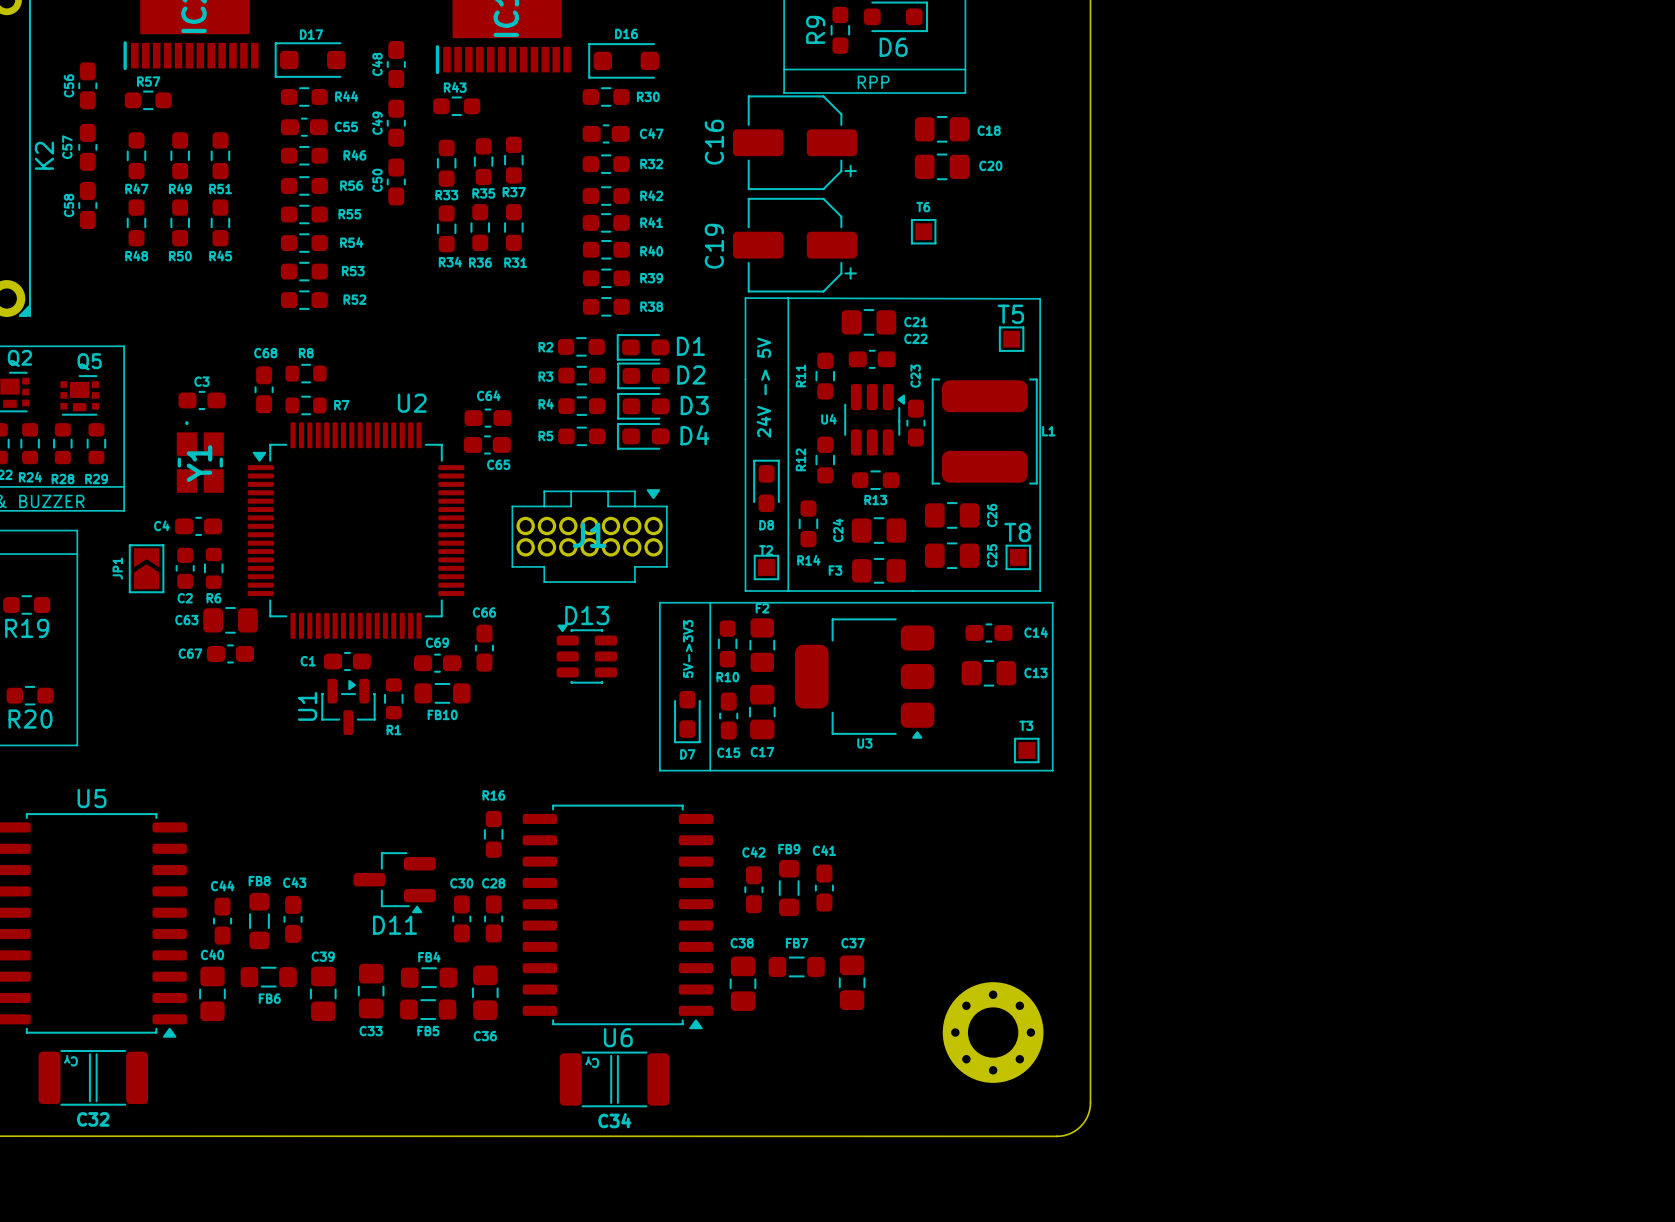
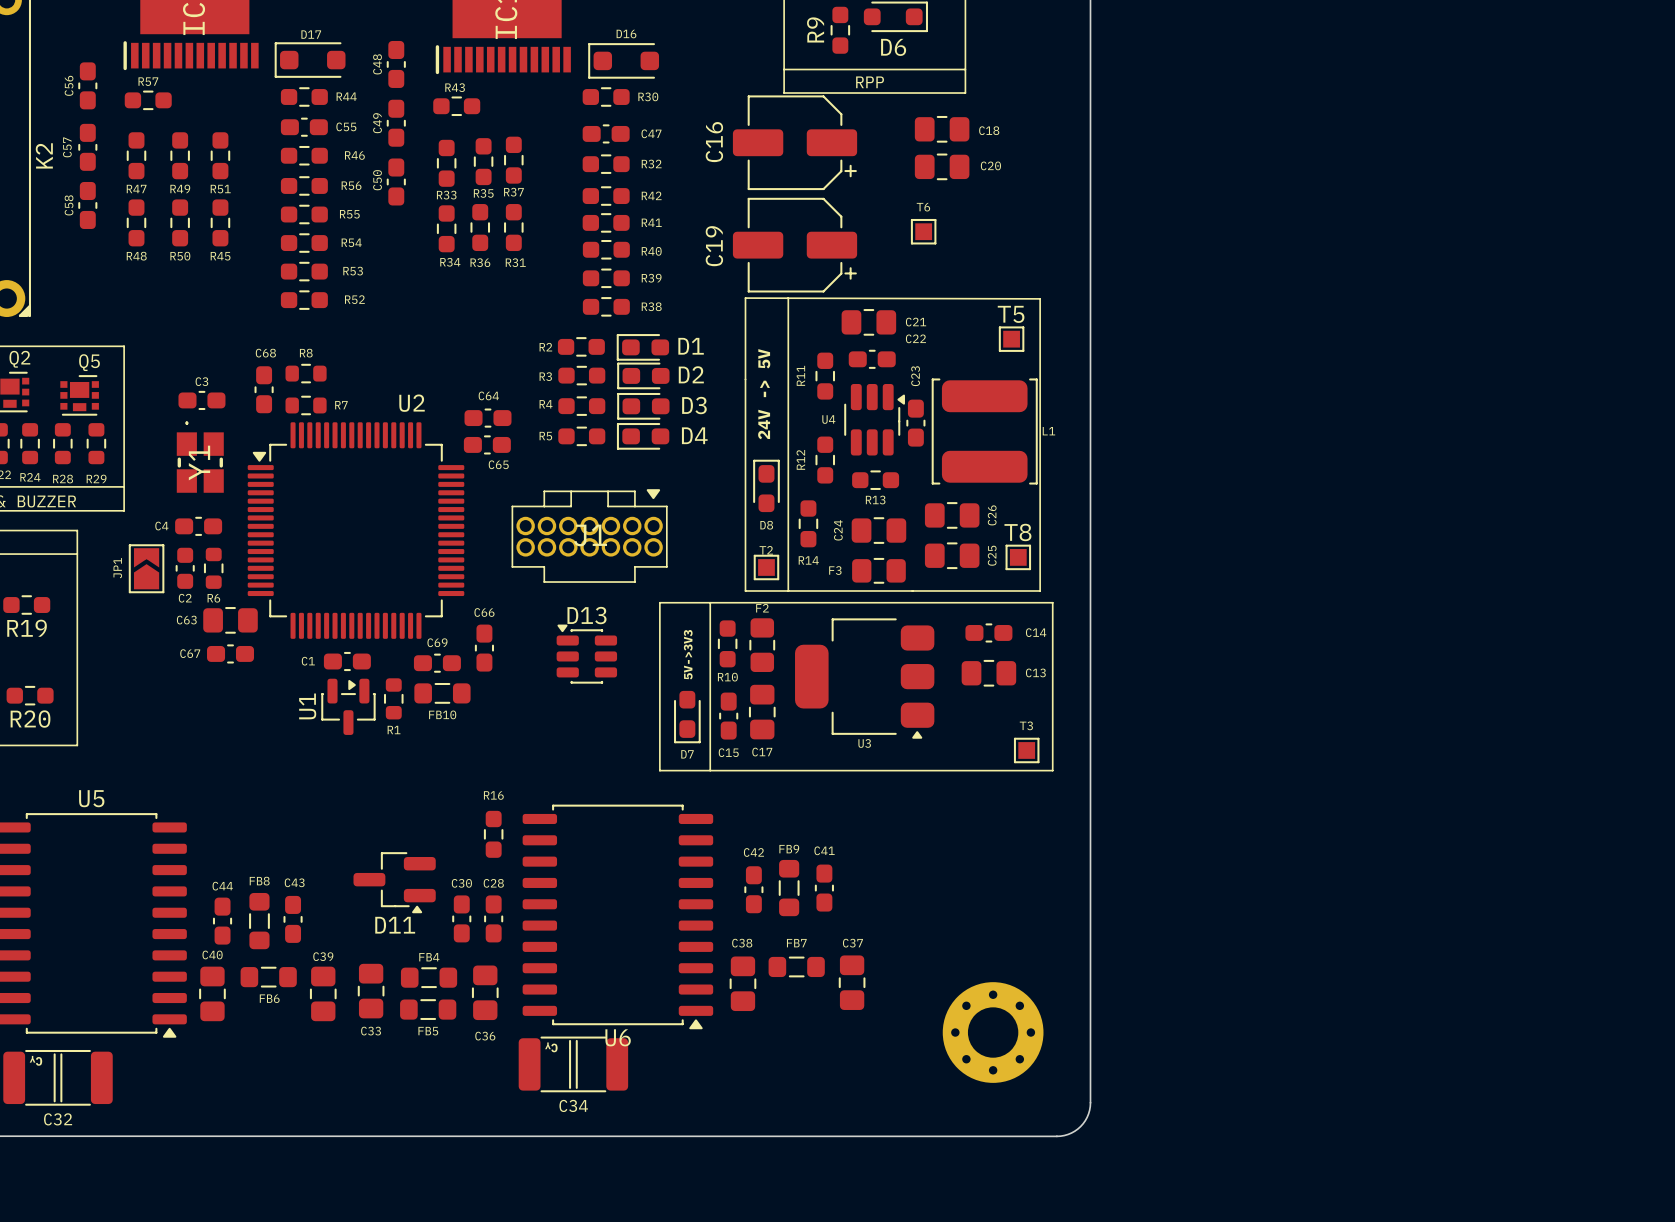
C32 position: (93, 1077) -> (58, 1077)
C34 position: (614, 1079) -> (573, 1064)

